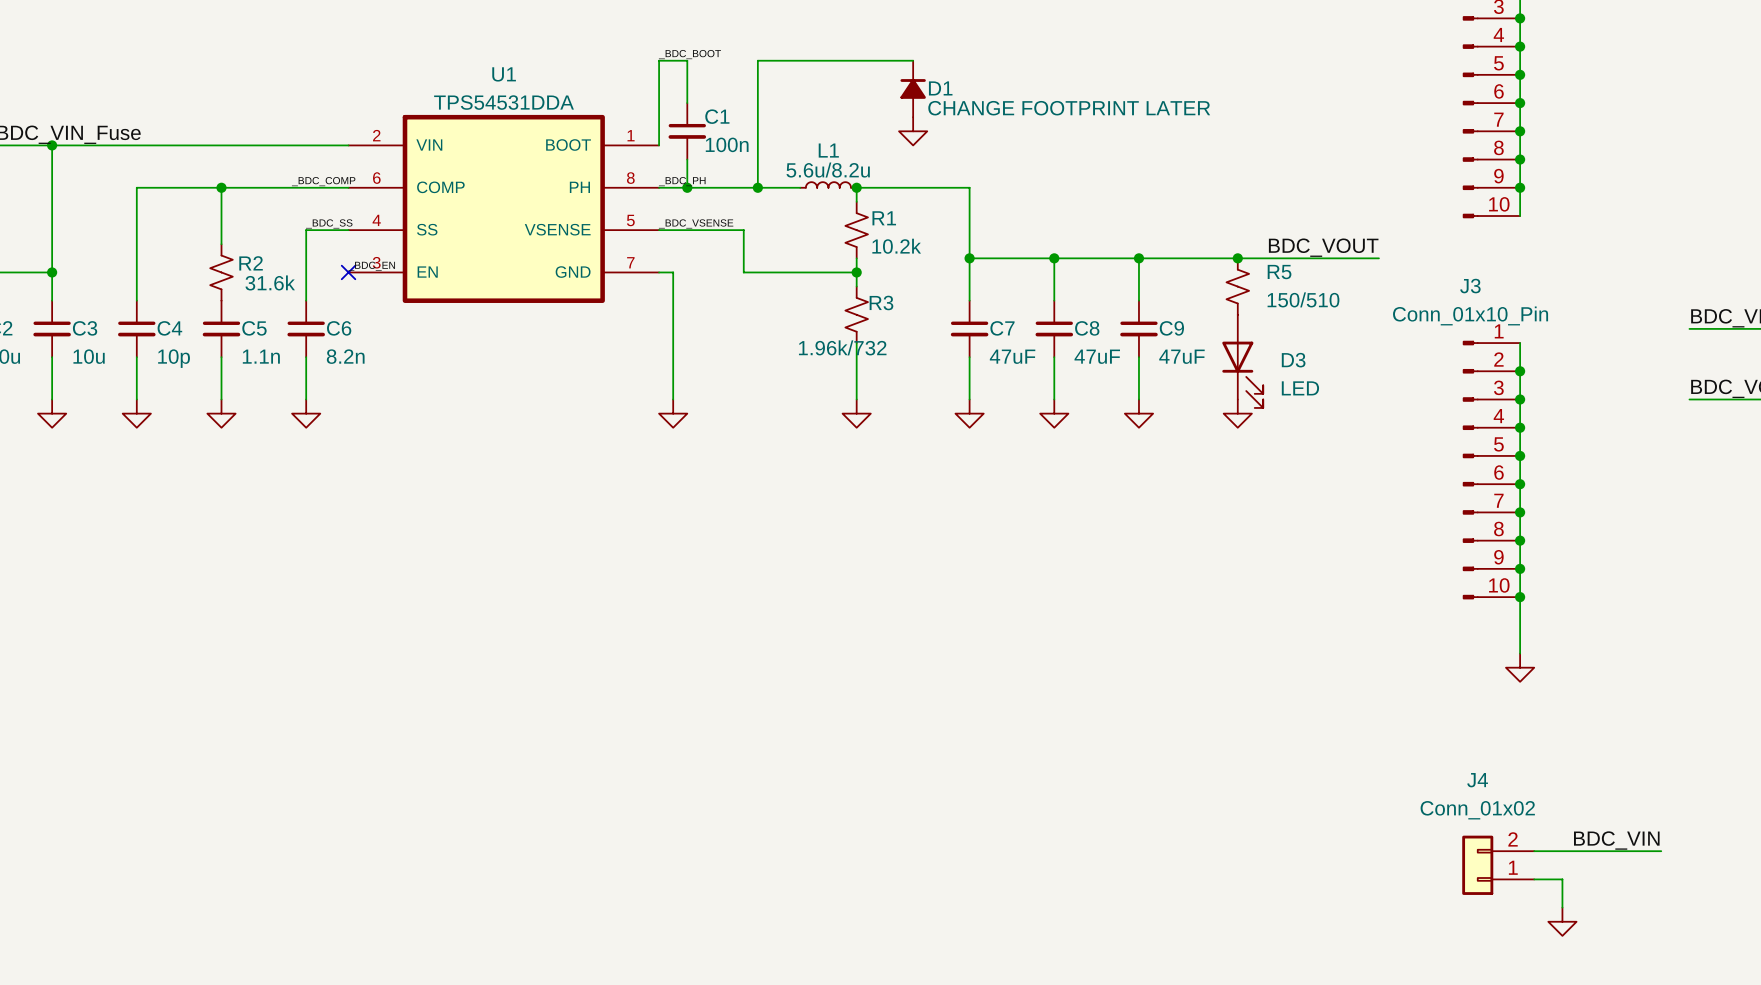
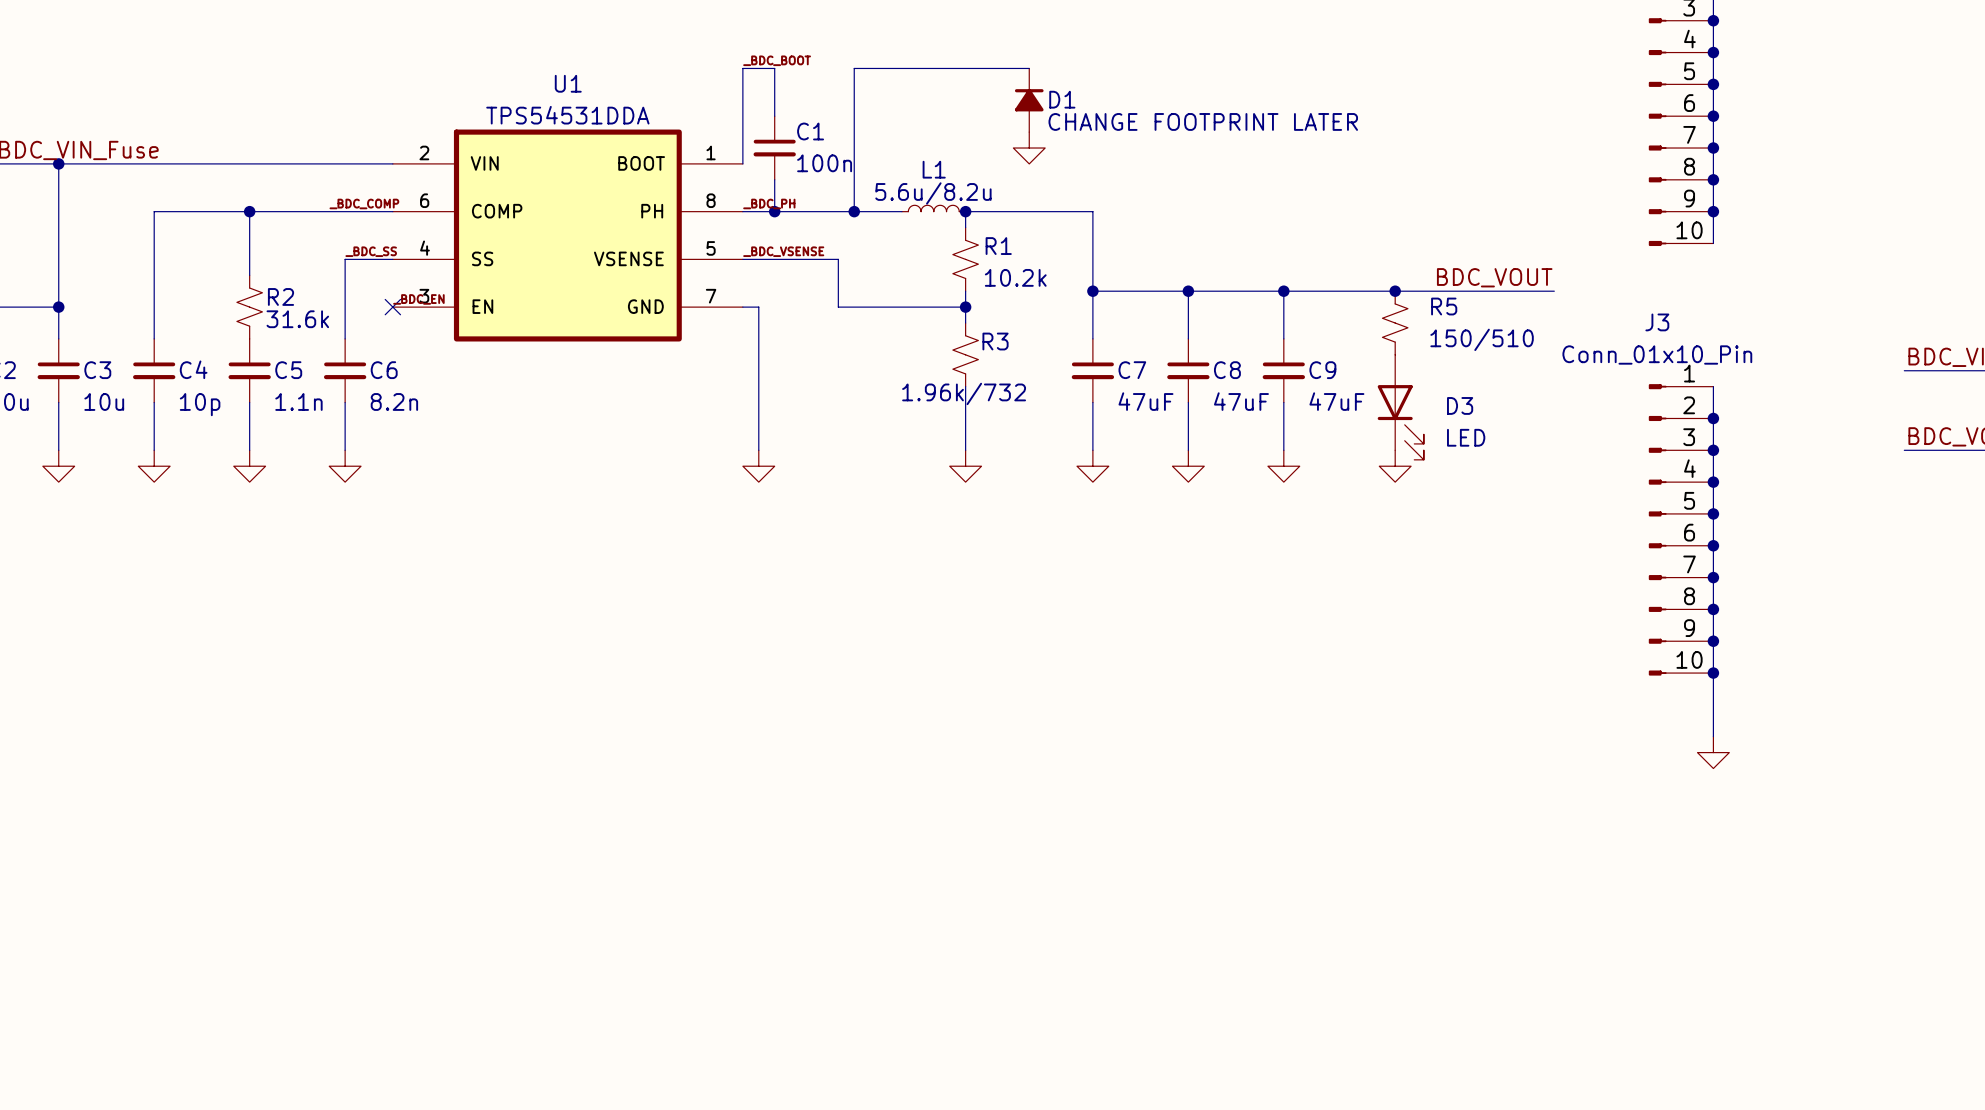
label: BDC_VIN (1616, 840) -> none
wire: (1534, 851) (1661, 851) -> none
J4: Conn_01x02 (1498, 865) -> none
wire: (1534, 879) (1562, 879) (1562, 907) -> none
power symbol: (1562, 921) -> none

